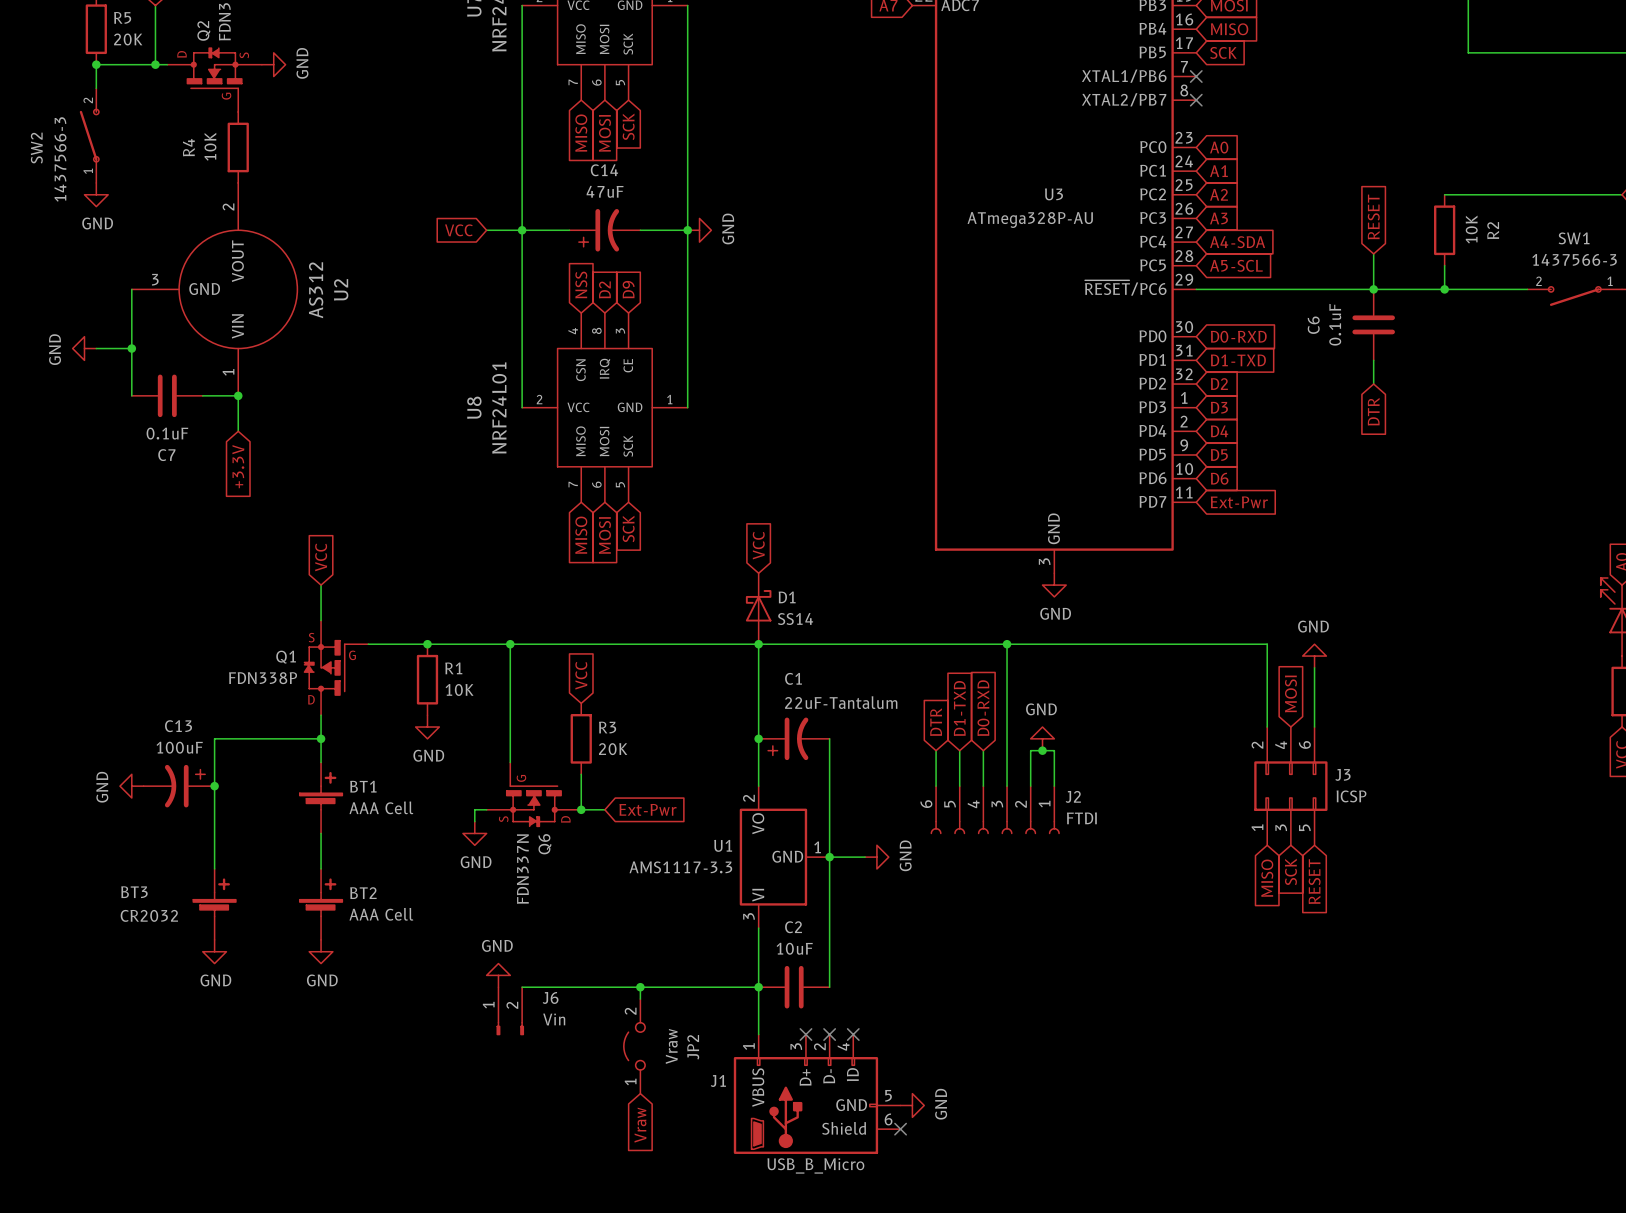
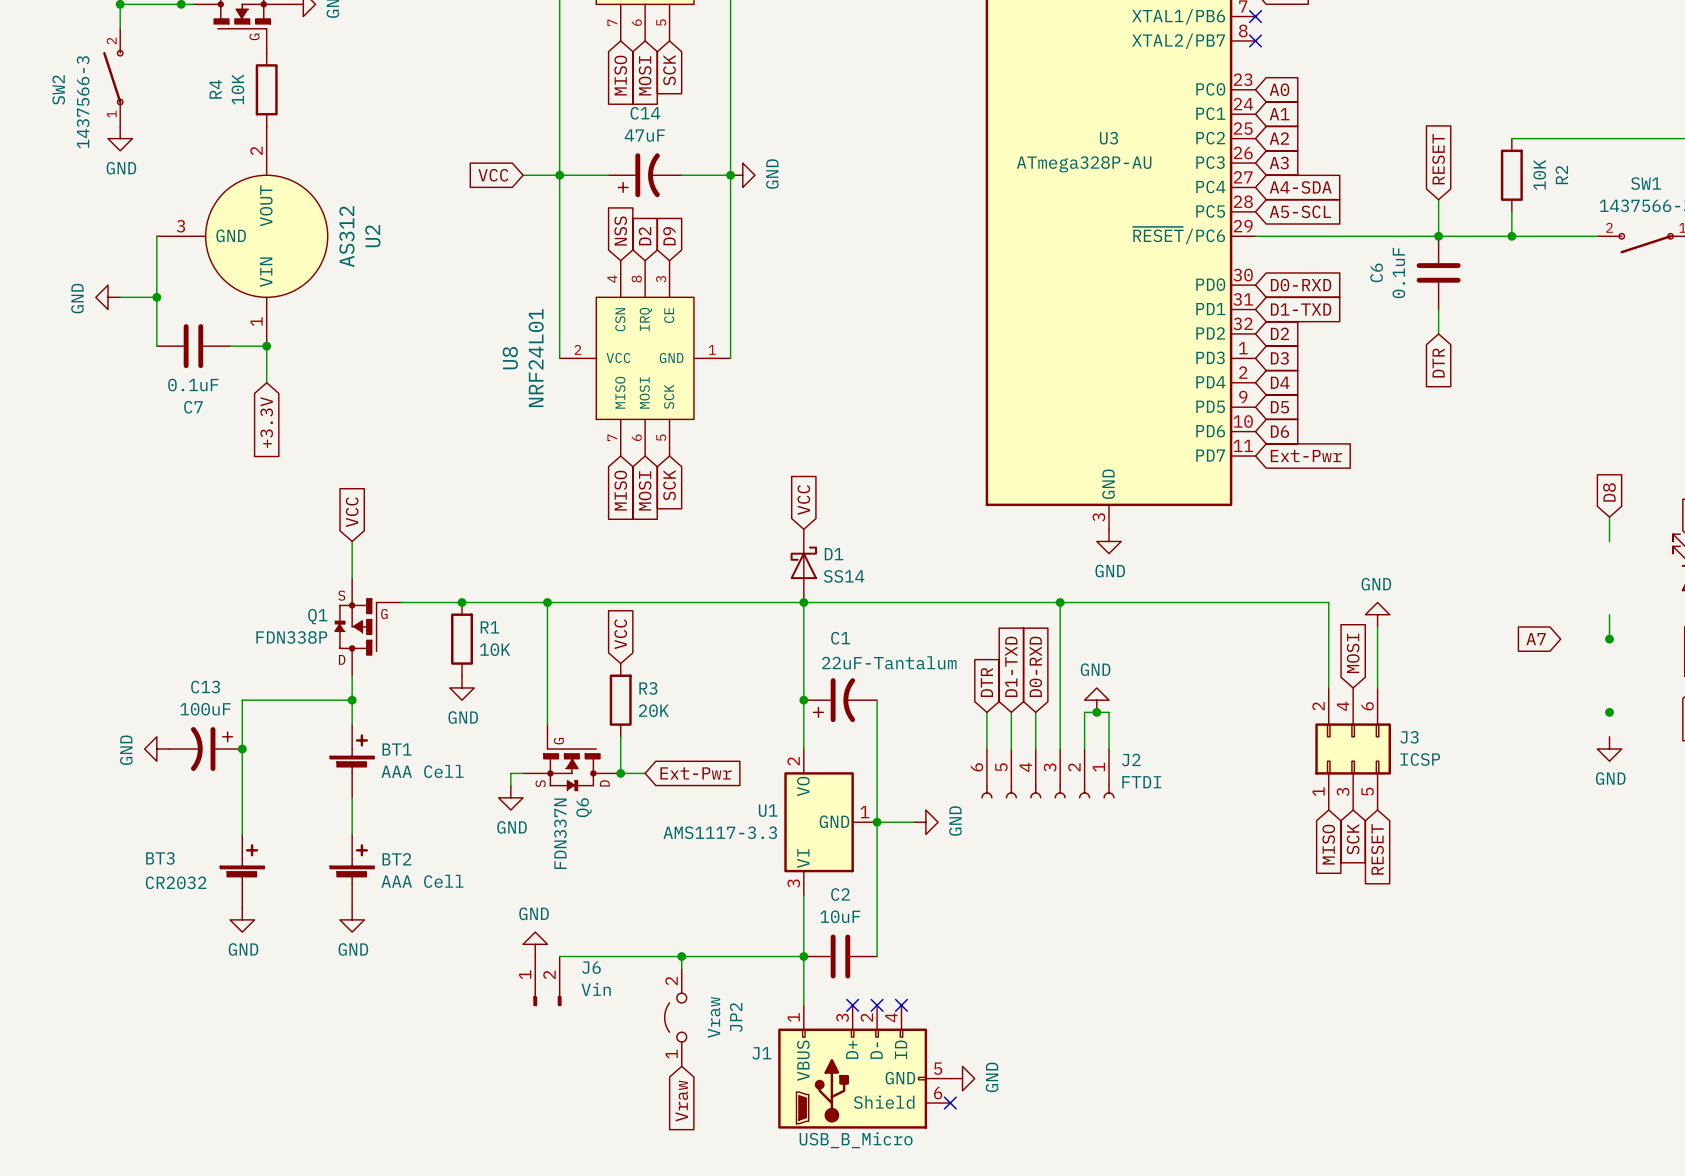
global label: none -> D8 (1609, 492)
wire: none -> (1609, 517) (1609, 541)
wire: none -> (1609, 614) (1609, 639)
global label: none -> A7 (1536, 639)
junction: none -> (1609, 639)
junction: none -> (1609, 712)
power symbol: none -> GND (1609, 749)

